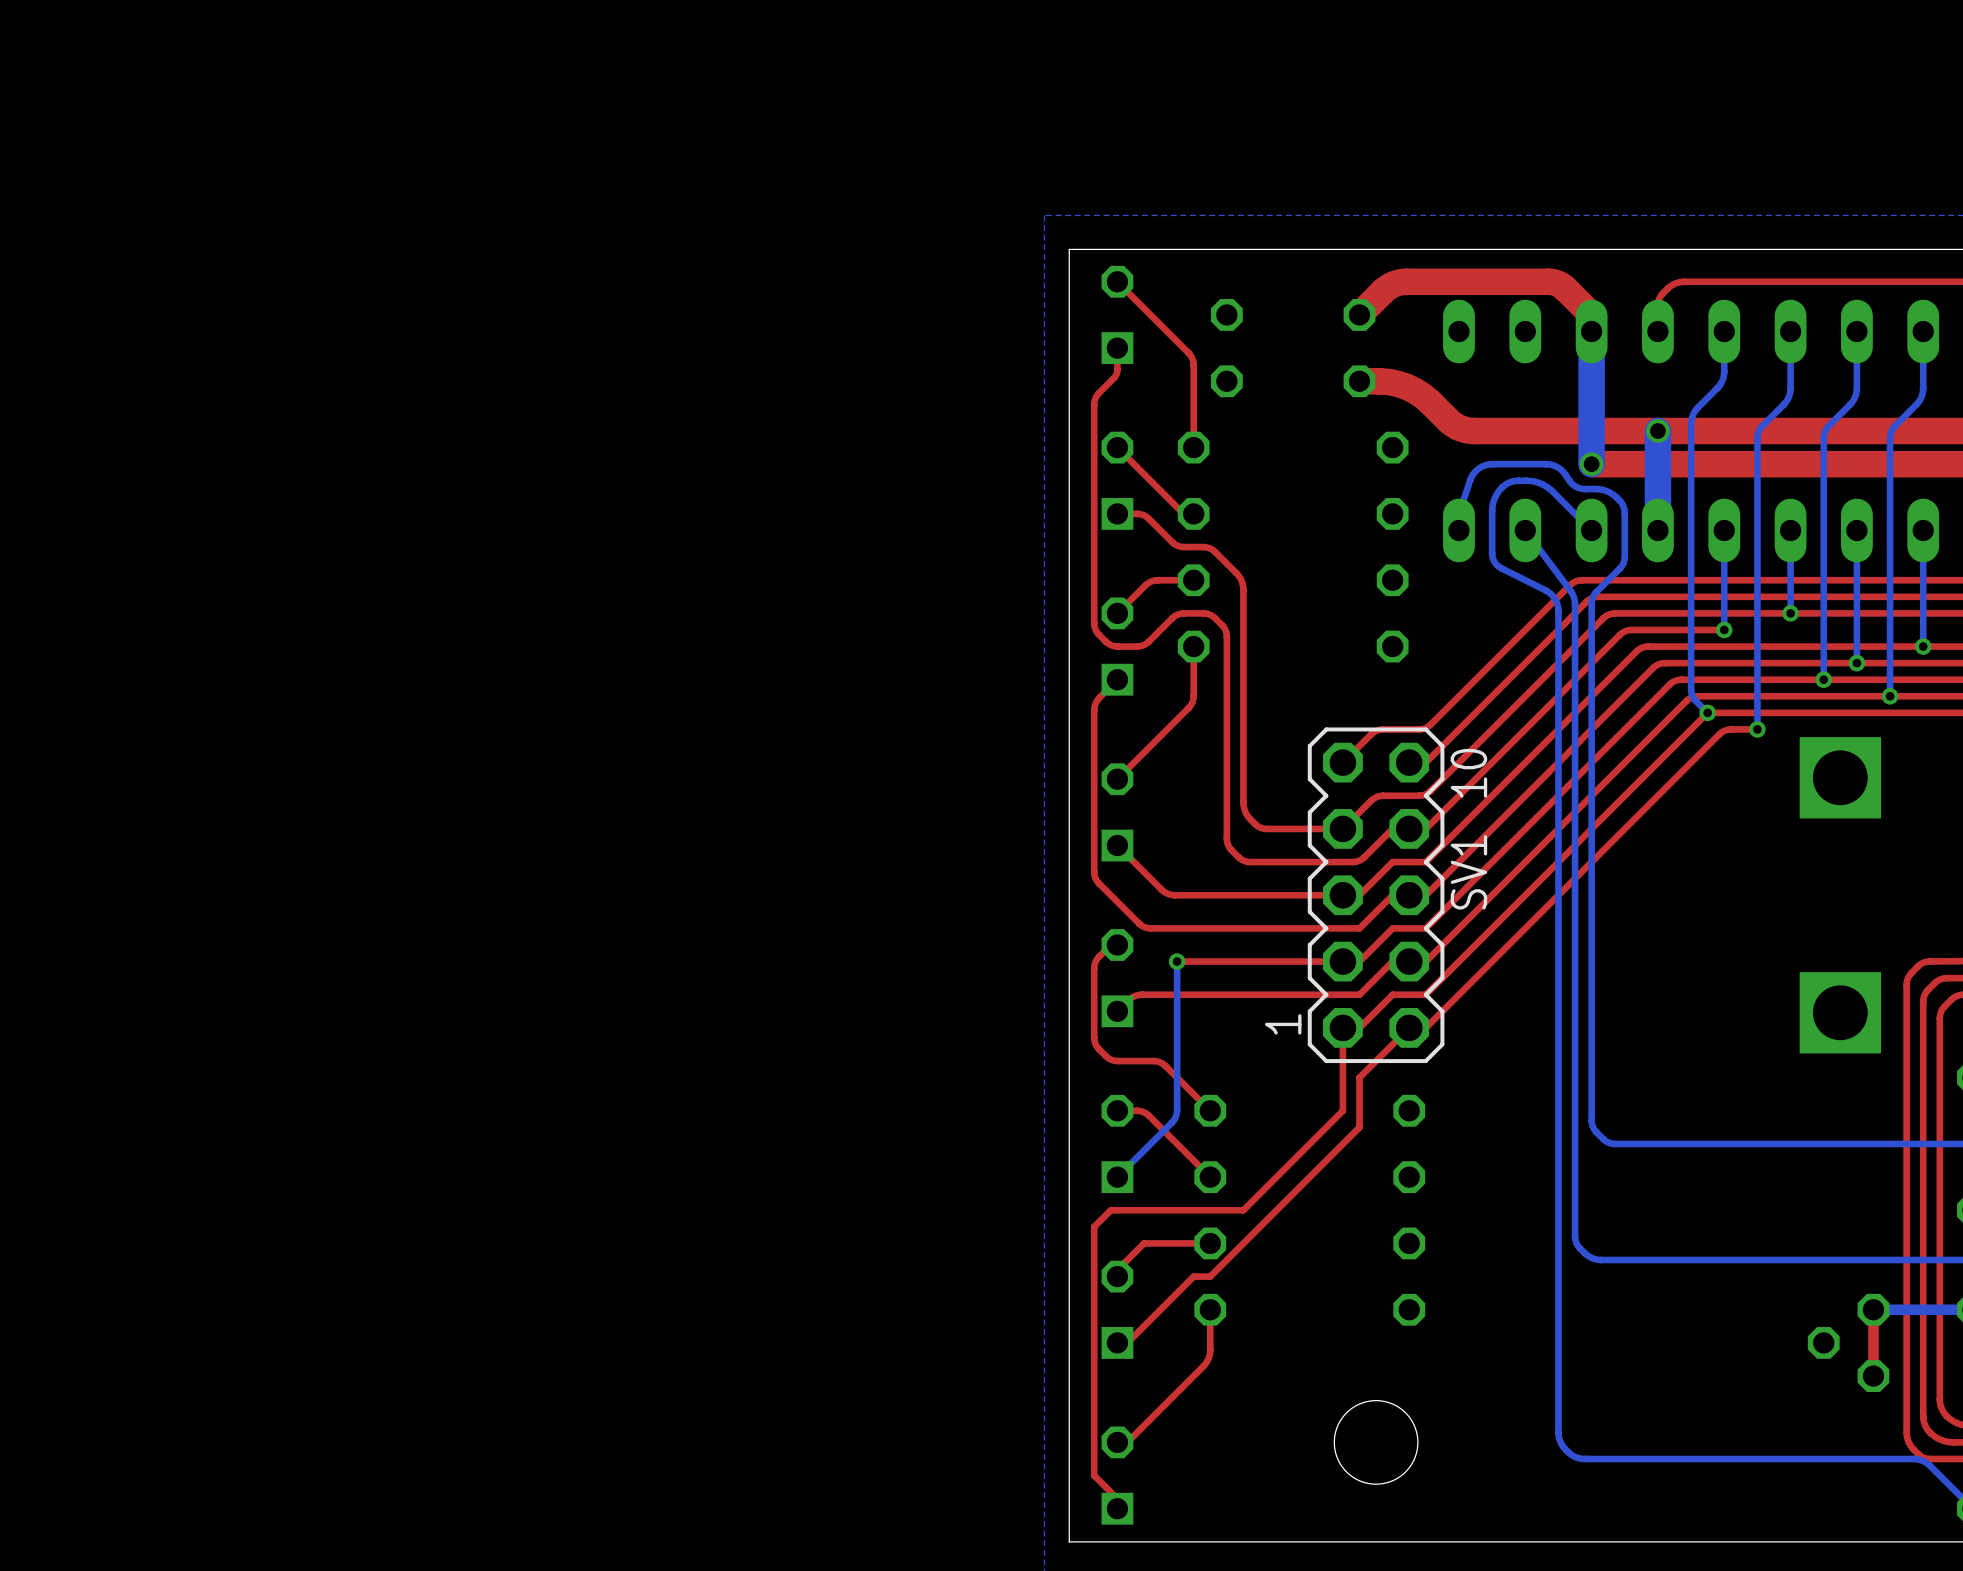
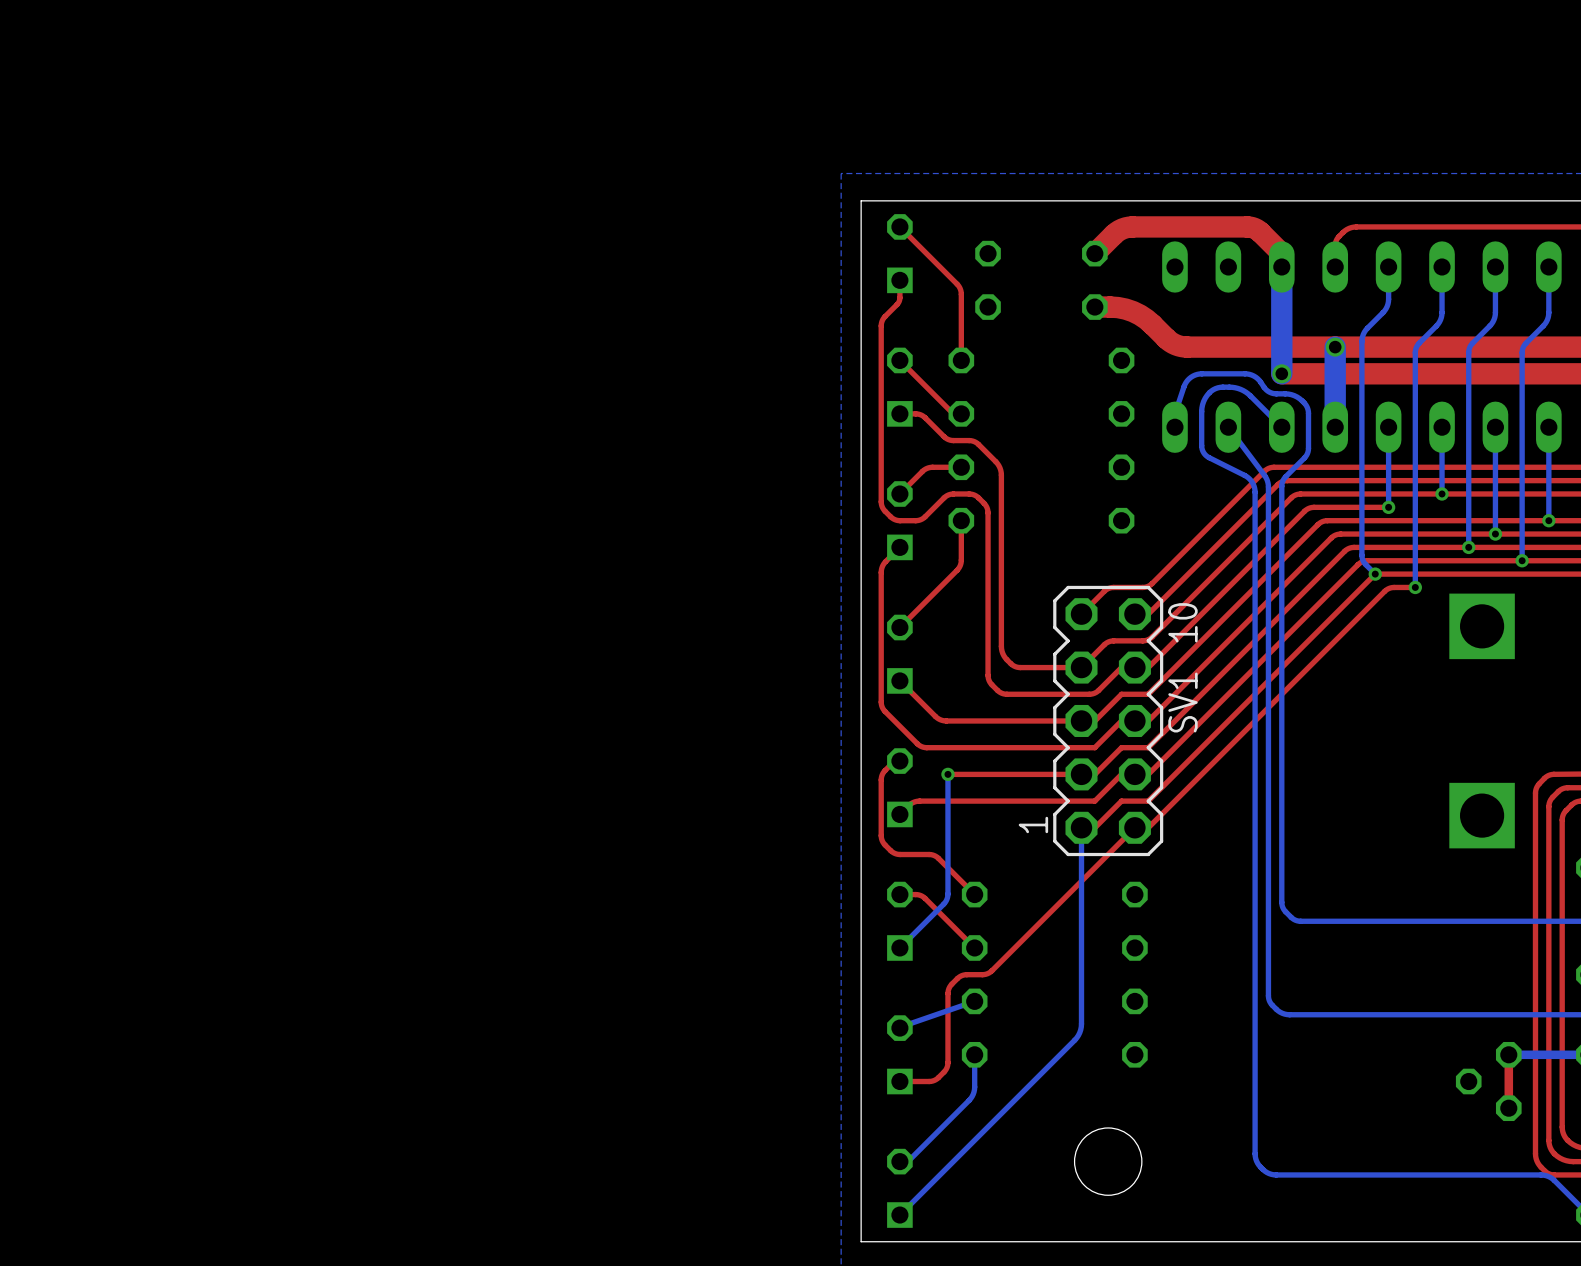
bottom track: none -> (1081, 827) (1081, 1023) (1079, 1032) (1074, 1040) (899, 1215)
top track: (1342, 1027) (1342, 1110) (1243, 1210) (1219, 1210) -> (1094, 867) (991, 970) (982, 974)
top track: (1359, 1077) (1359, 1127) (1210, 1276) (1193, 1276) (1127, 1342) -> none
top track: (1200, 1210) (1110, 1210) (1094, 1226) (1094, 1475) (1117, 1498) (1117, 1508) -> (966, 974) (958, 977) (948, 990) (947, 1062) (946, 1069) (932, 1081) (907, 1081)
bottom track: none -> (974, 1001) (899, 1028)
top track: (1210, 1243) (1143, 1243) (1117, 1269) (1117, 1276) -> none
bottom track: none -> (974, 1054) (974, 1089) (970, 1098) (907, 1161) (899, 1161)
top track: (1210, 1309) (1210, 1352) (1205, 1364) (1127, 1442) (1117, 1442) -> none

